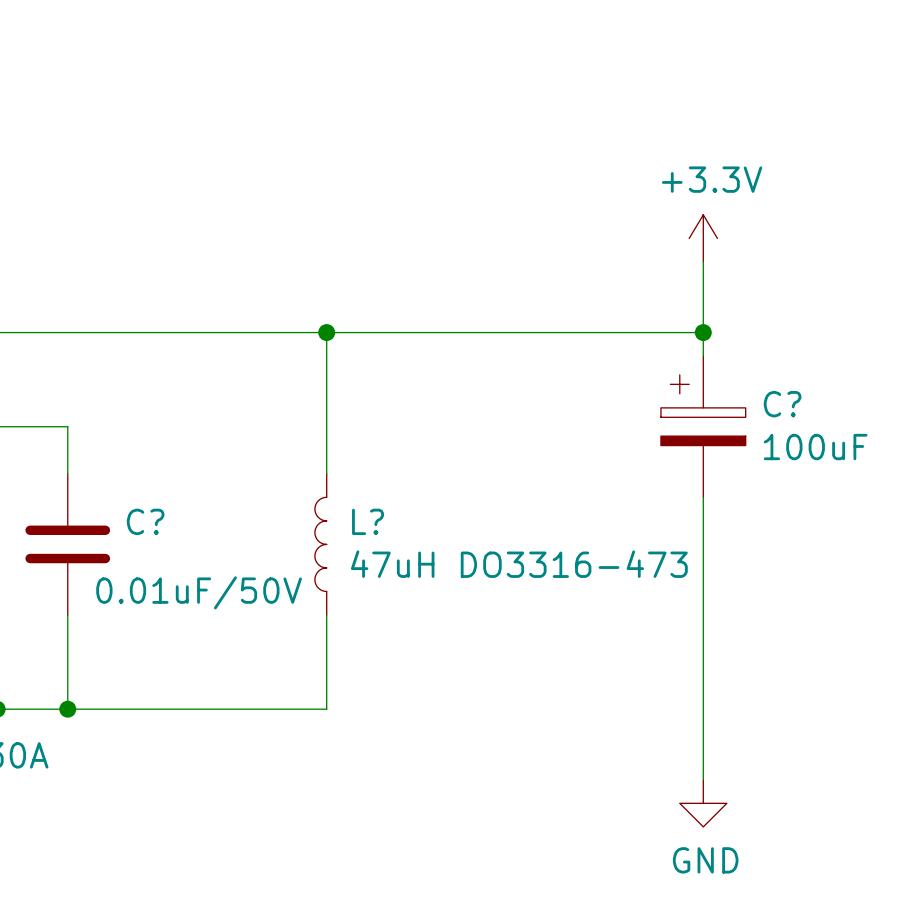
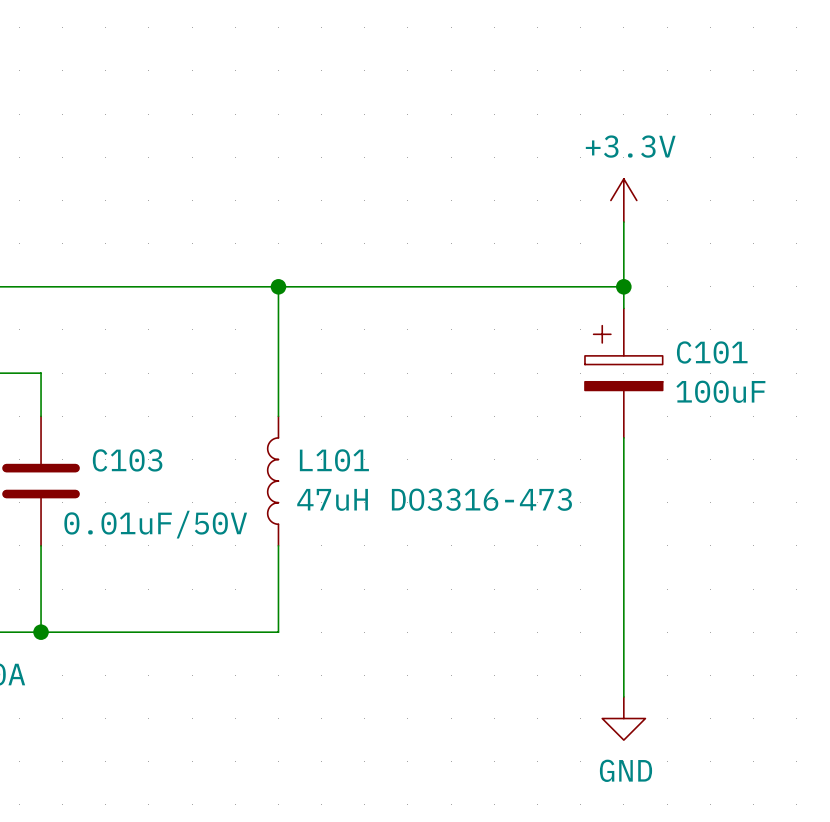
C? name: C? (782, 404) -> C101 (712, 352)
C? name: C? (145, 521) -> C103 (127, 460)
L? name: L? (368, 521) -> L101 (334, 460)

